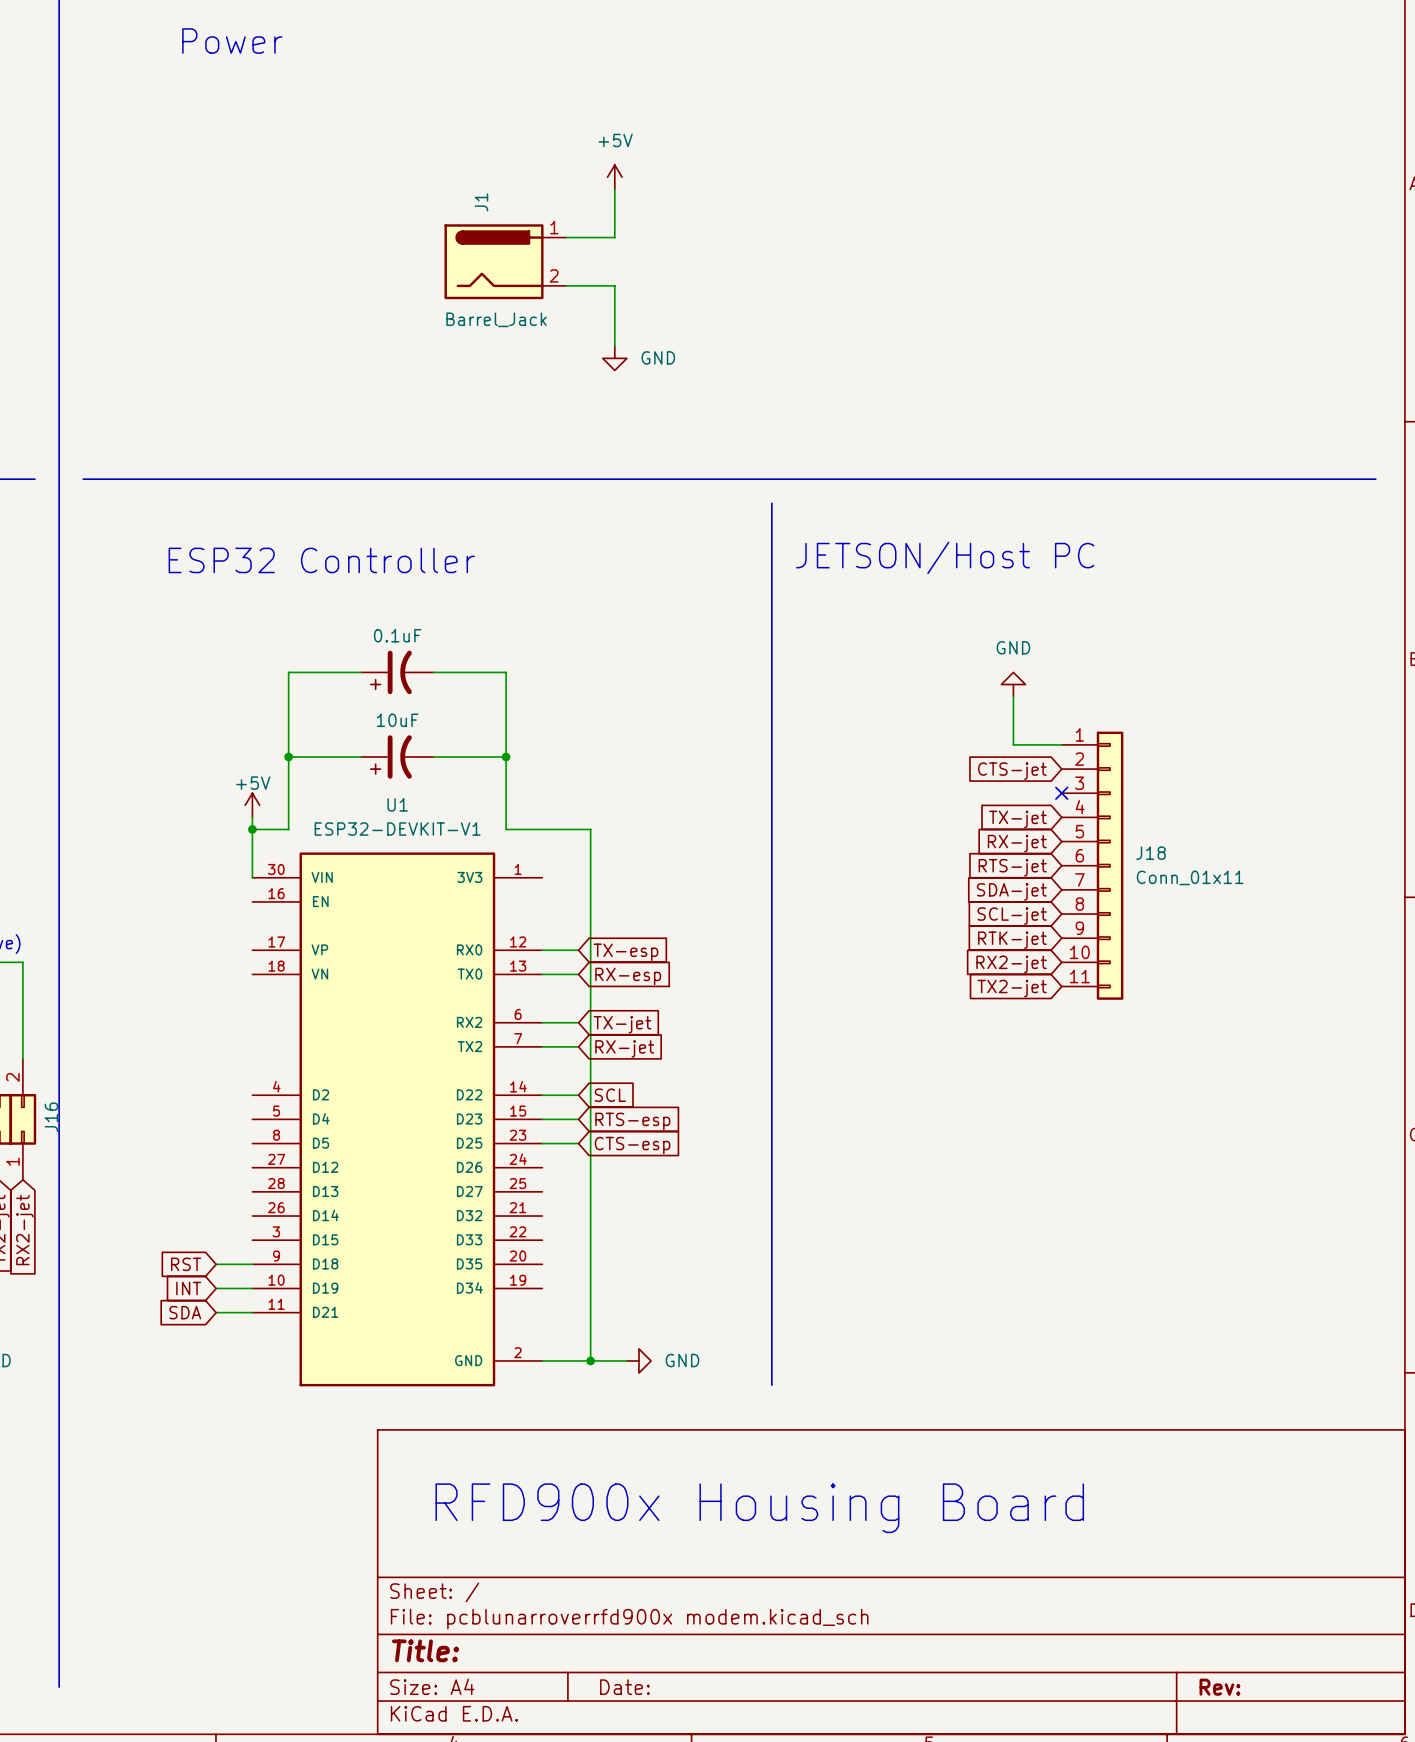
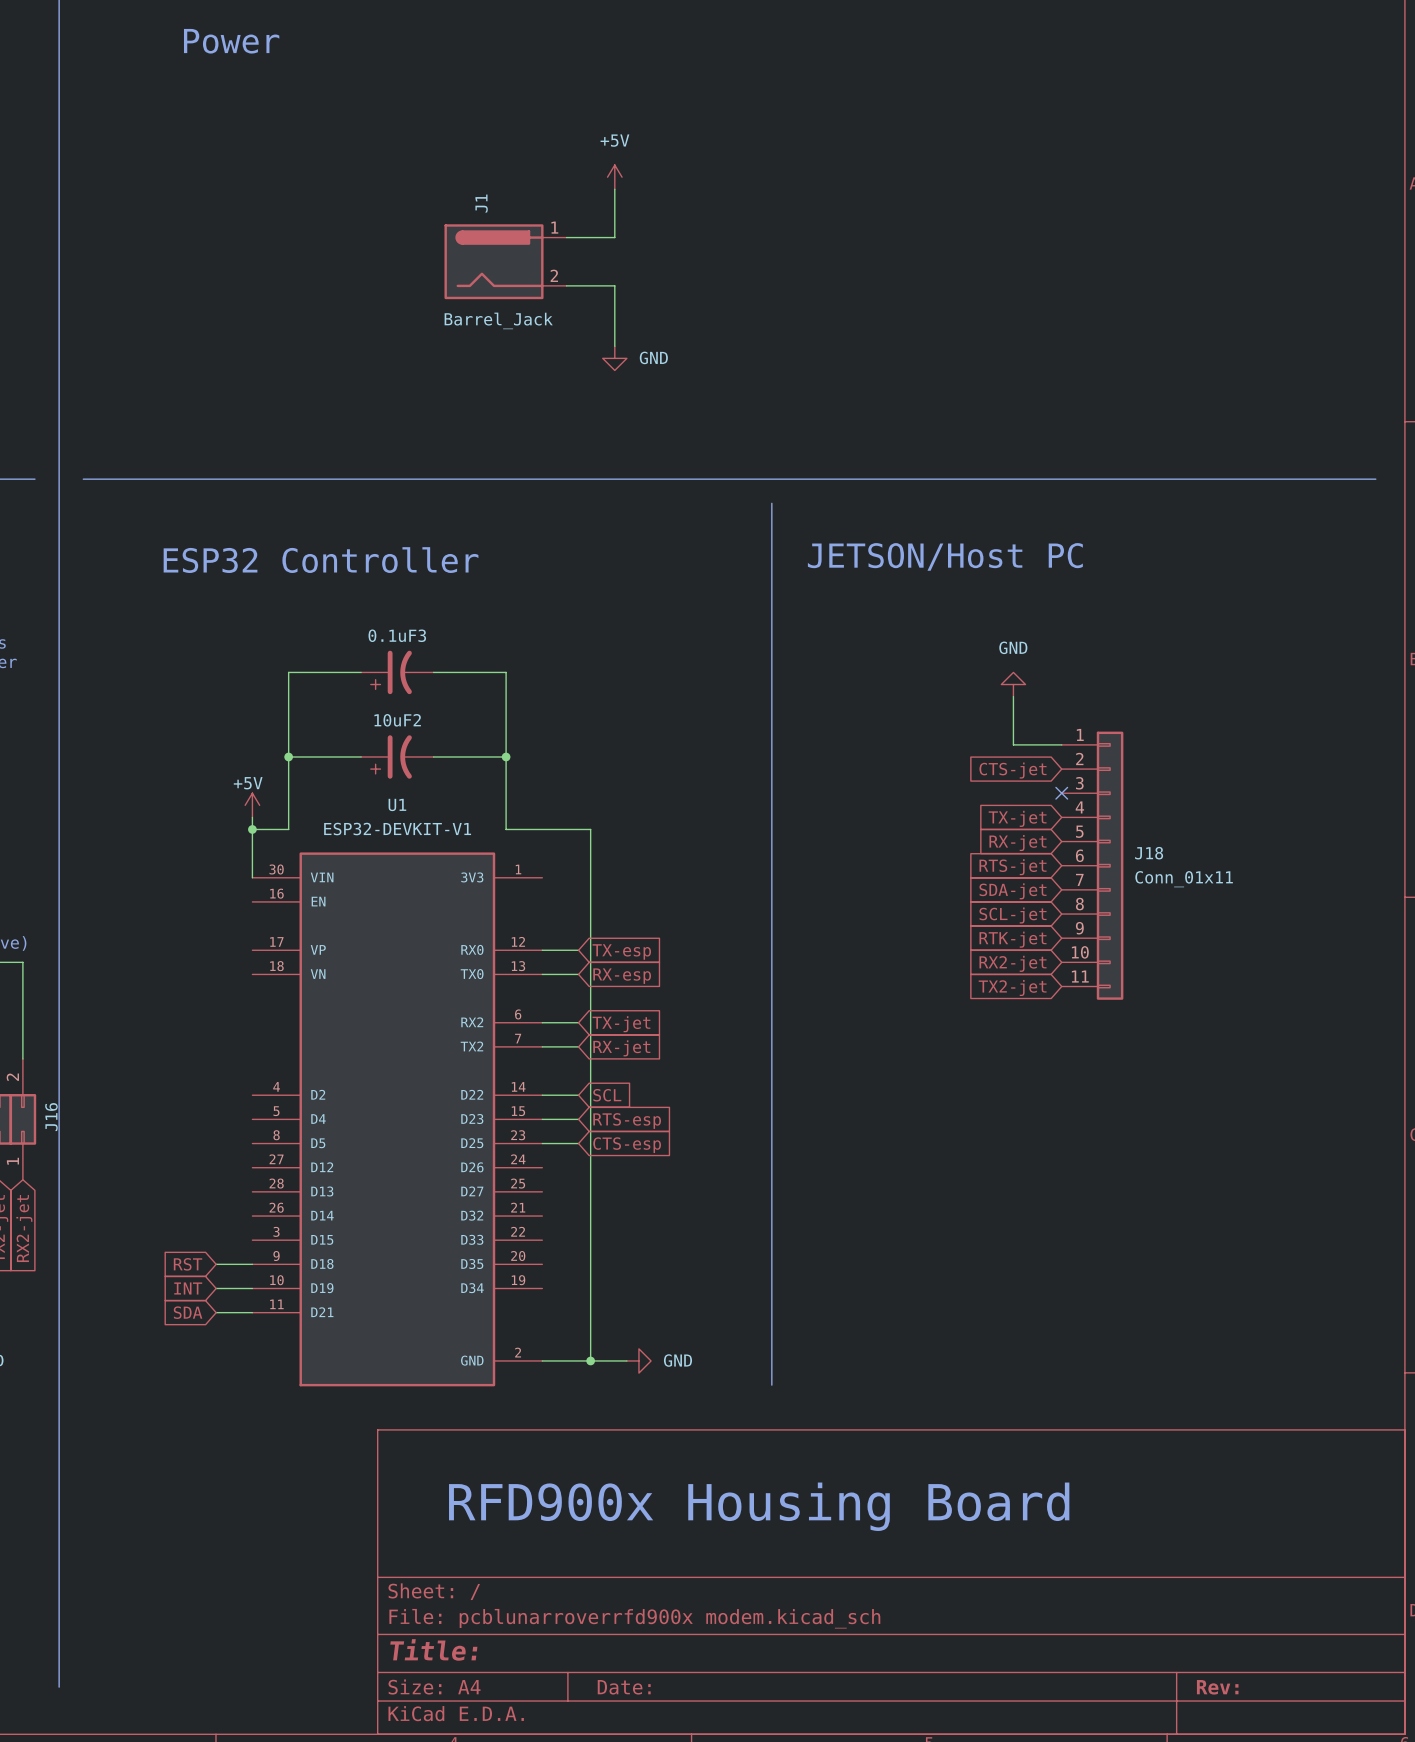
0.1uF name: 0.1uF (397, 635) -> 0.1uF3 (397, 635)
10uF name: 10uF (397, 720) -> 10uF2 (397, 720)

